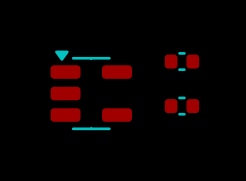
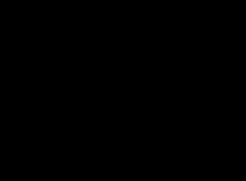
part: (181, 61) -> none
part: (91, 90) -> none
part: (181, 106) -> none

